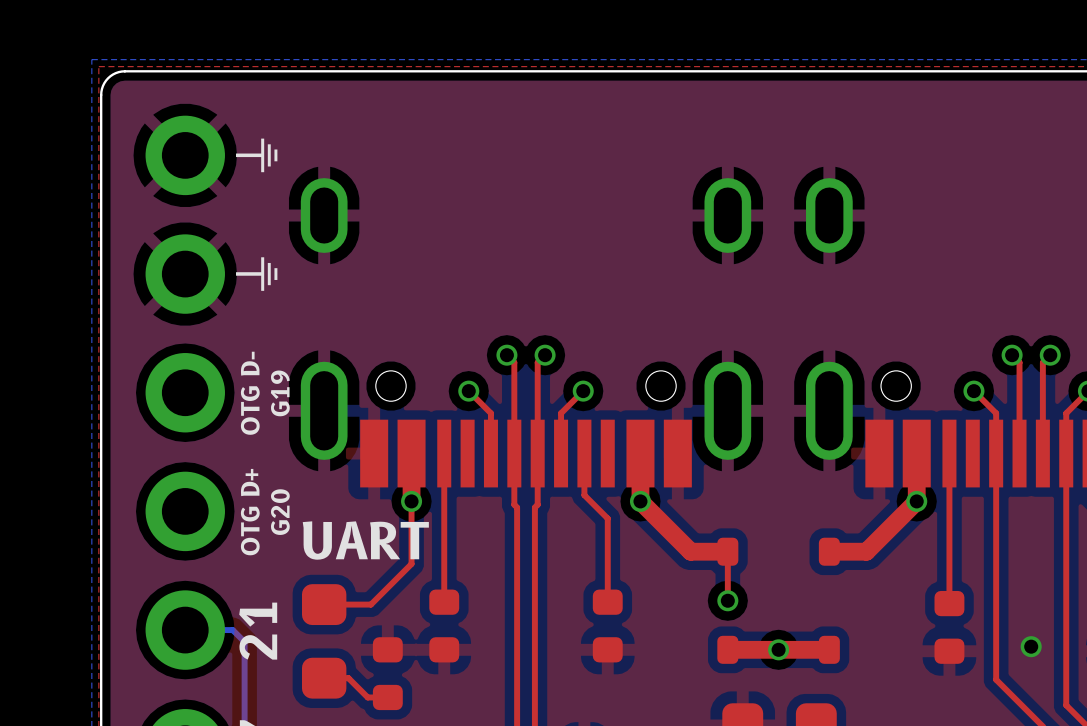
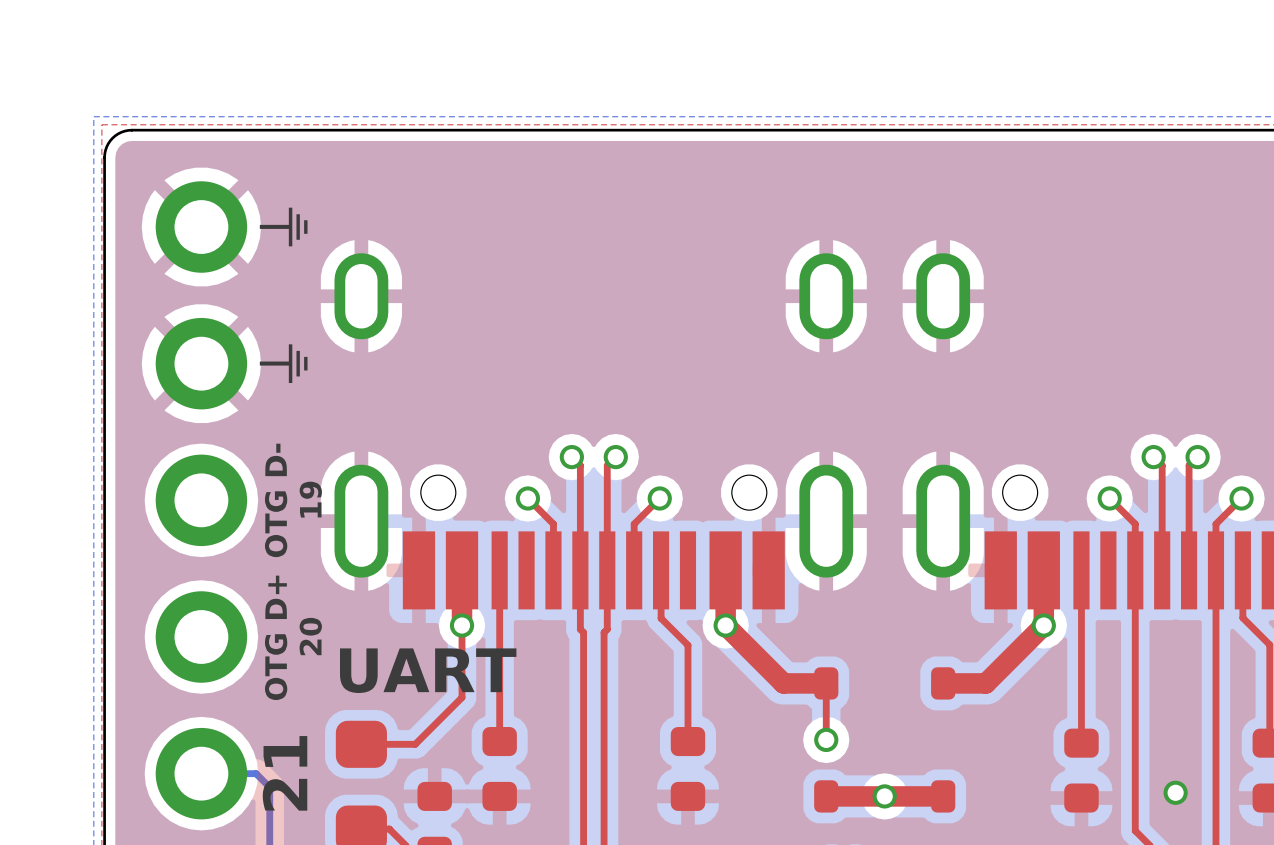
text: G19 (280, 393) -> 19 (310, 499)
text: G20 (280, 512) -> 20 (310, 636)

